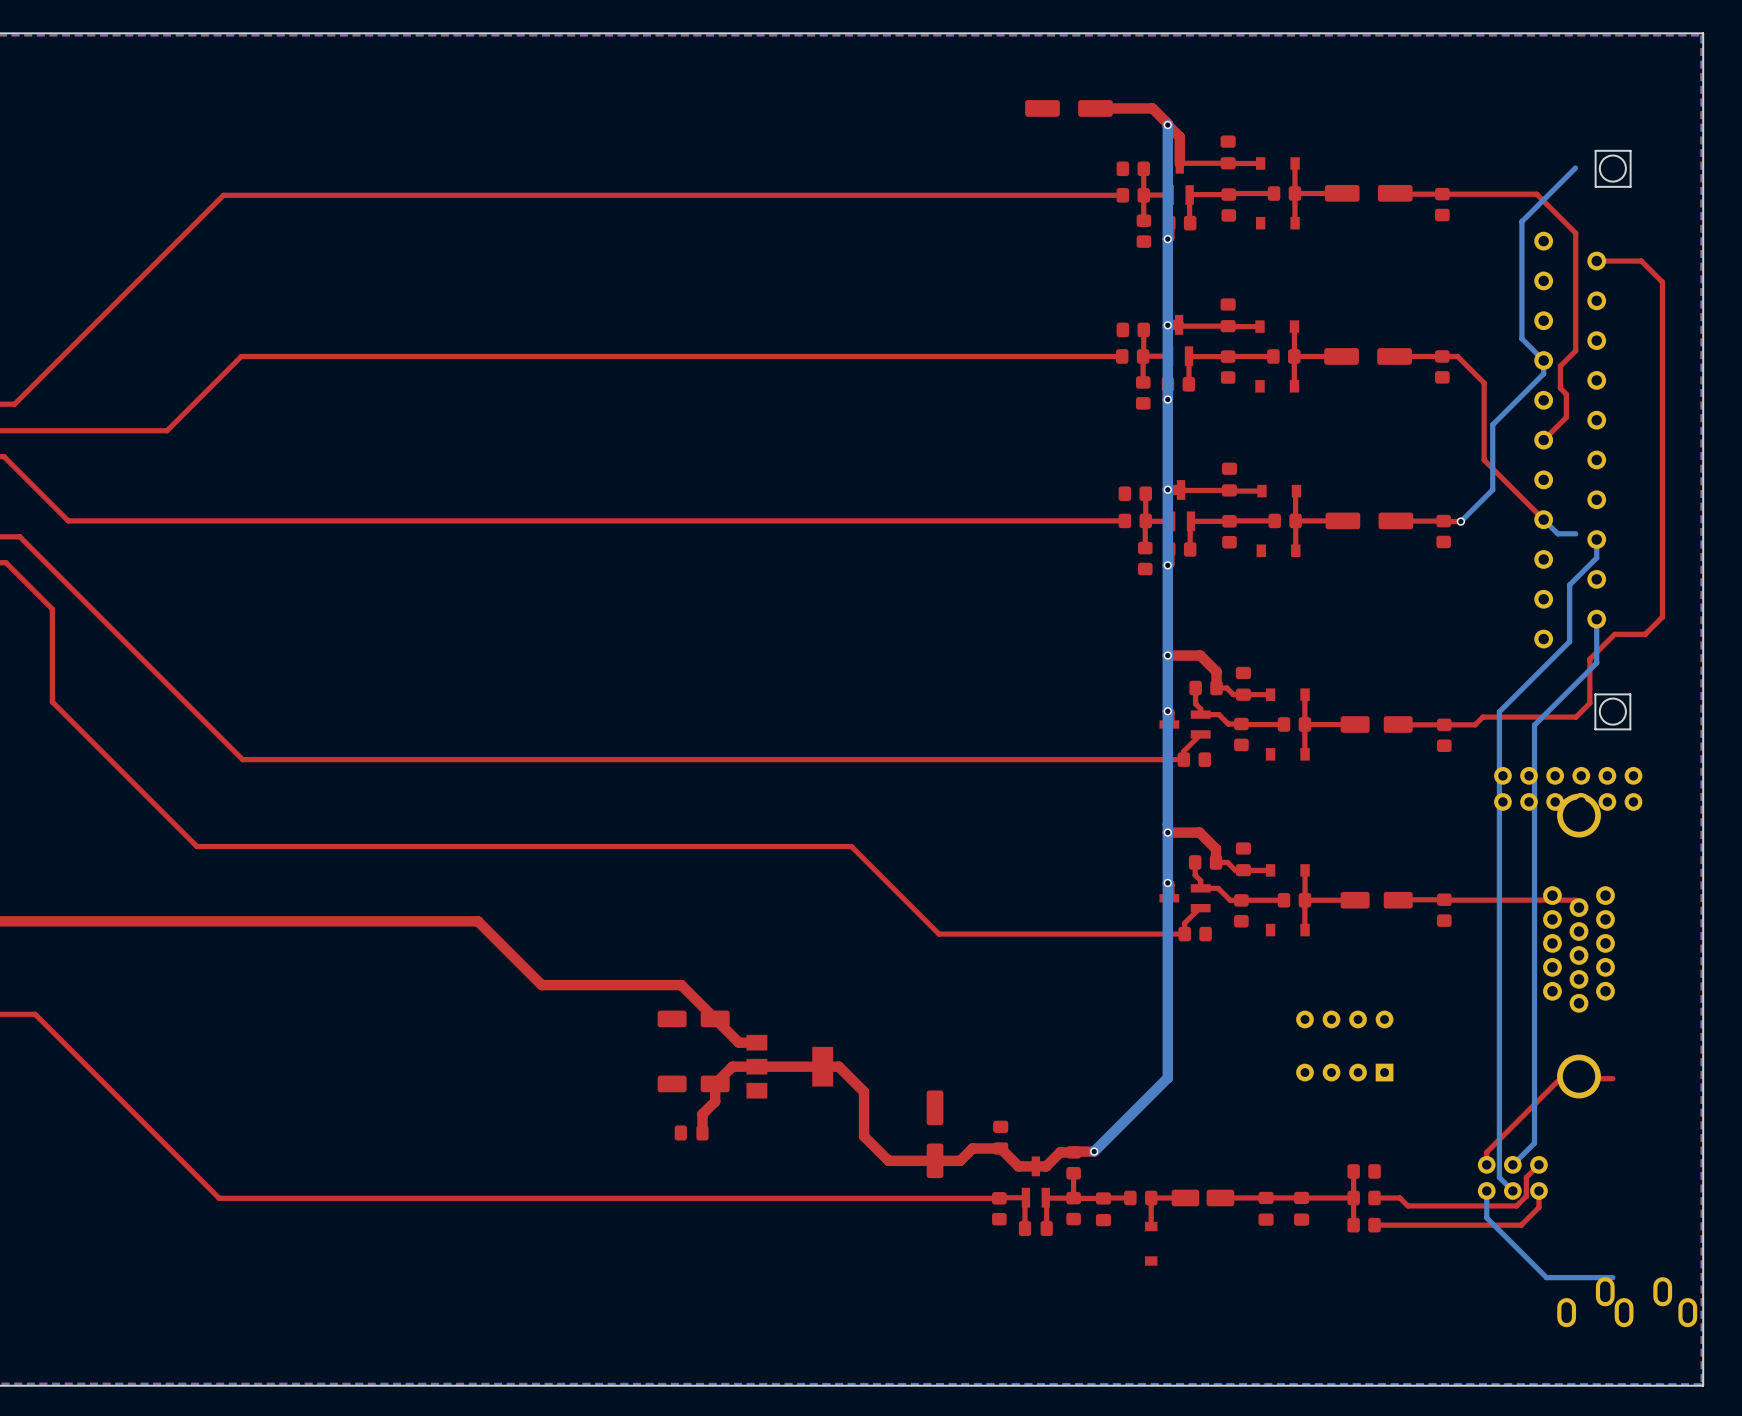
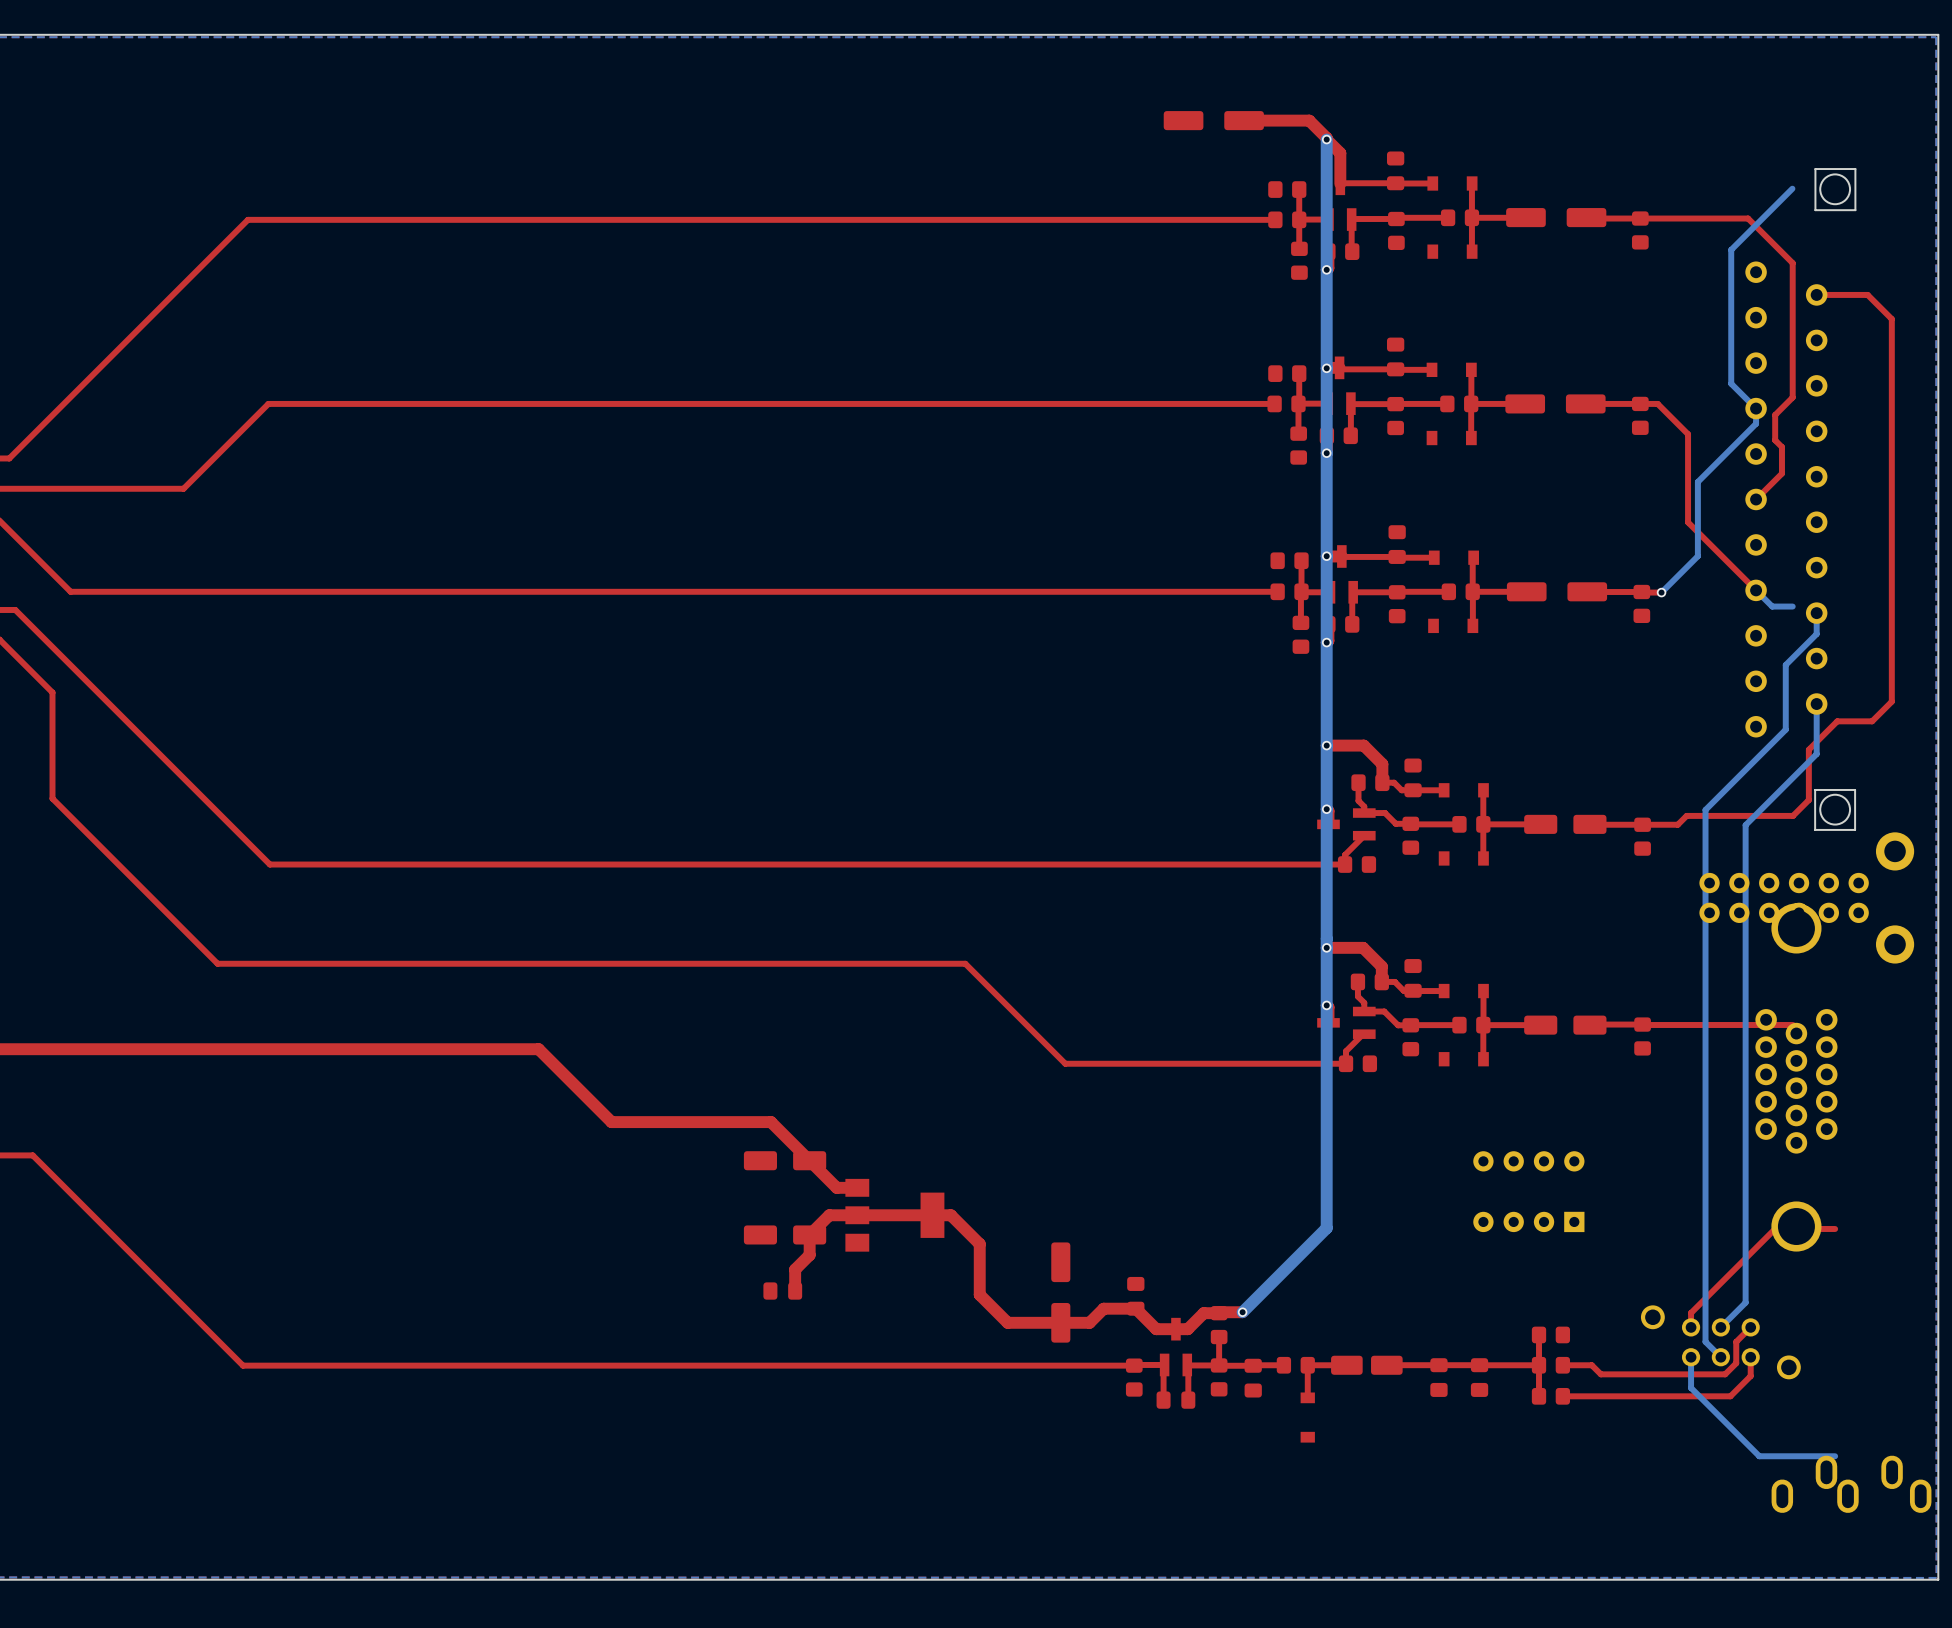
part: none -> (1806, 897)
part footprint: [1477, 1155, 1548, 1200] -> [1640, 1305, 1801, 1380]

